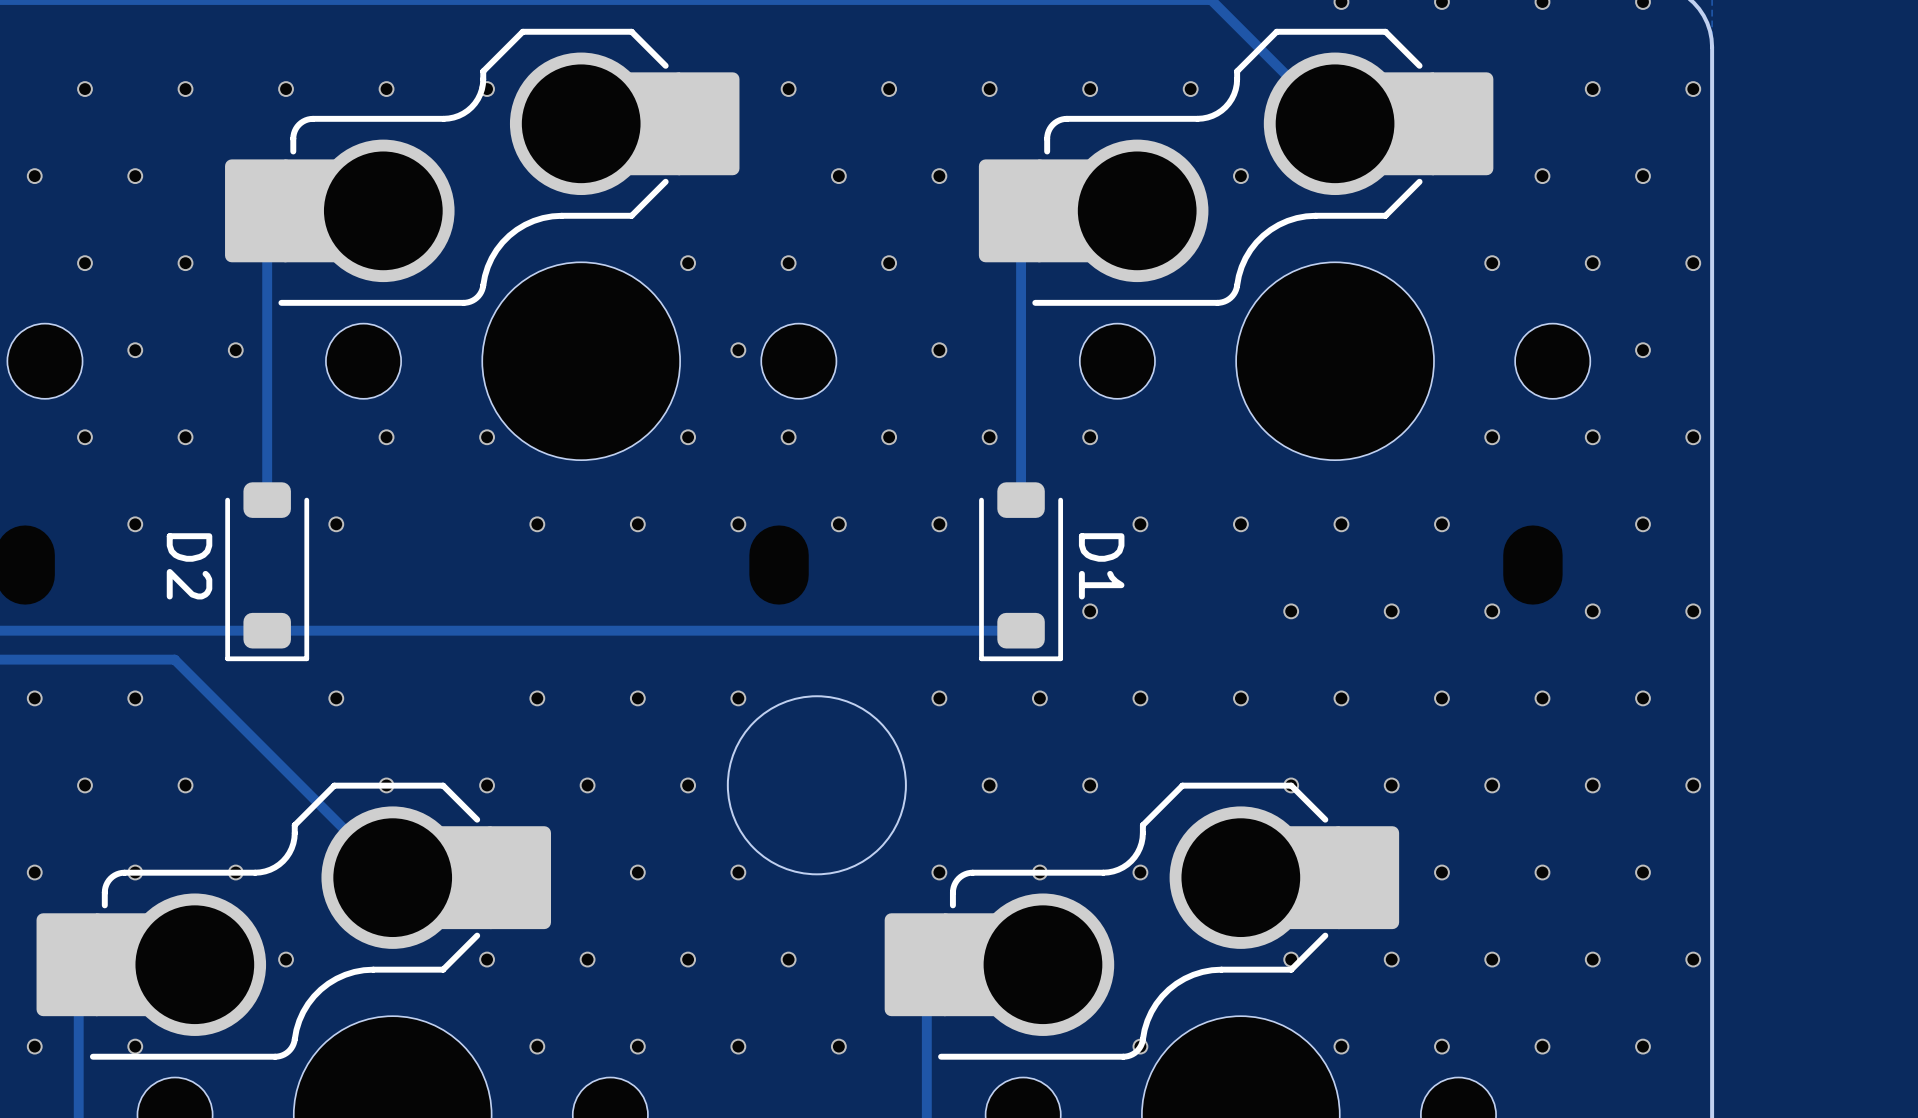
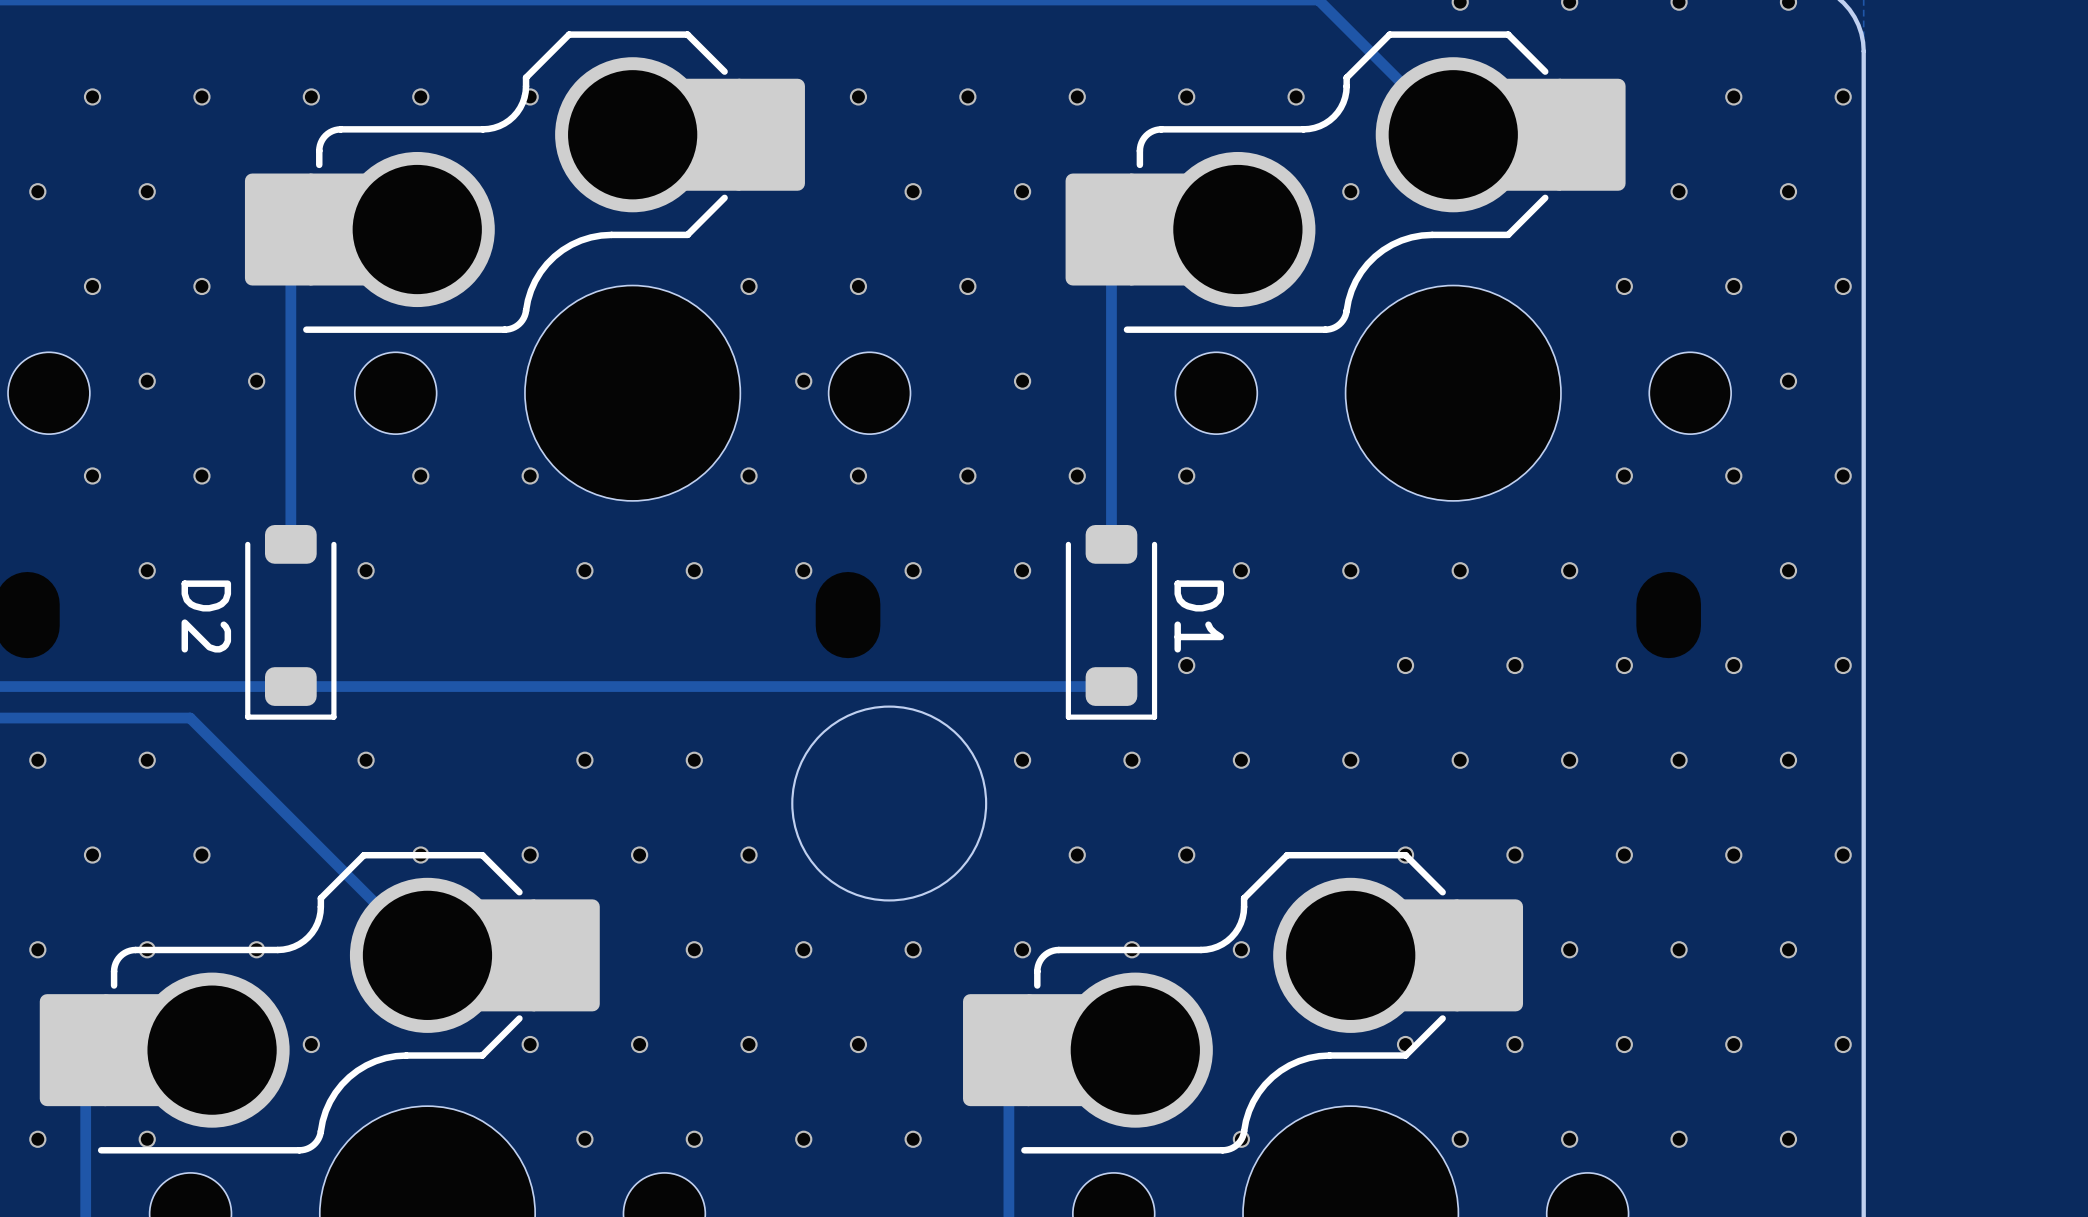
via position: (738, 698) -> (913, 949)
round board edge position: (816, 785) -> (889, 803)

